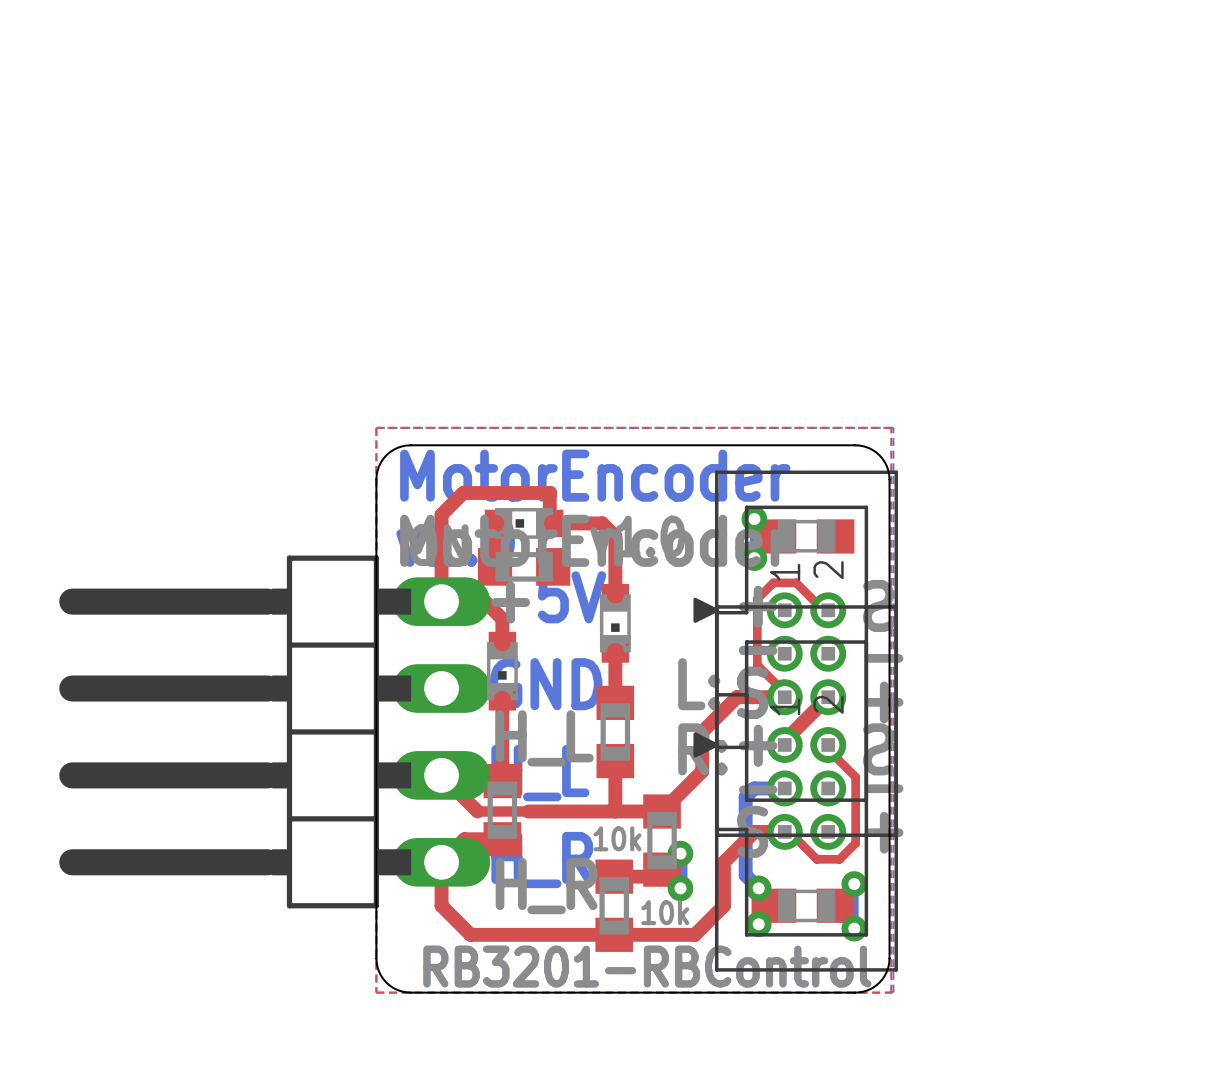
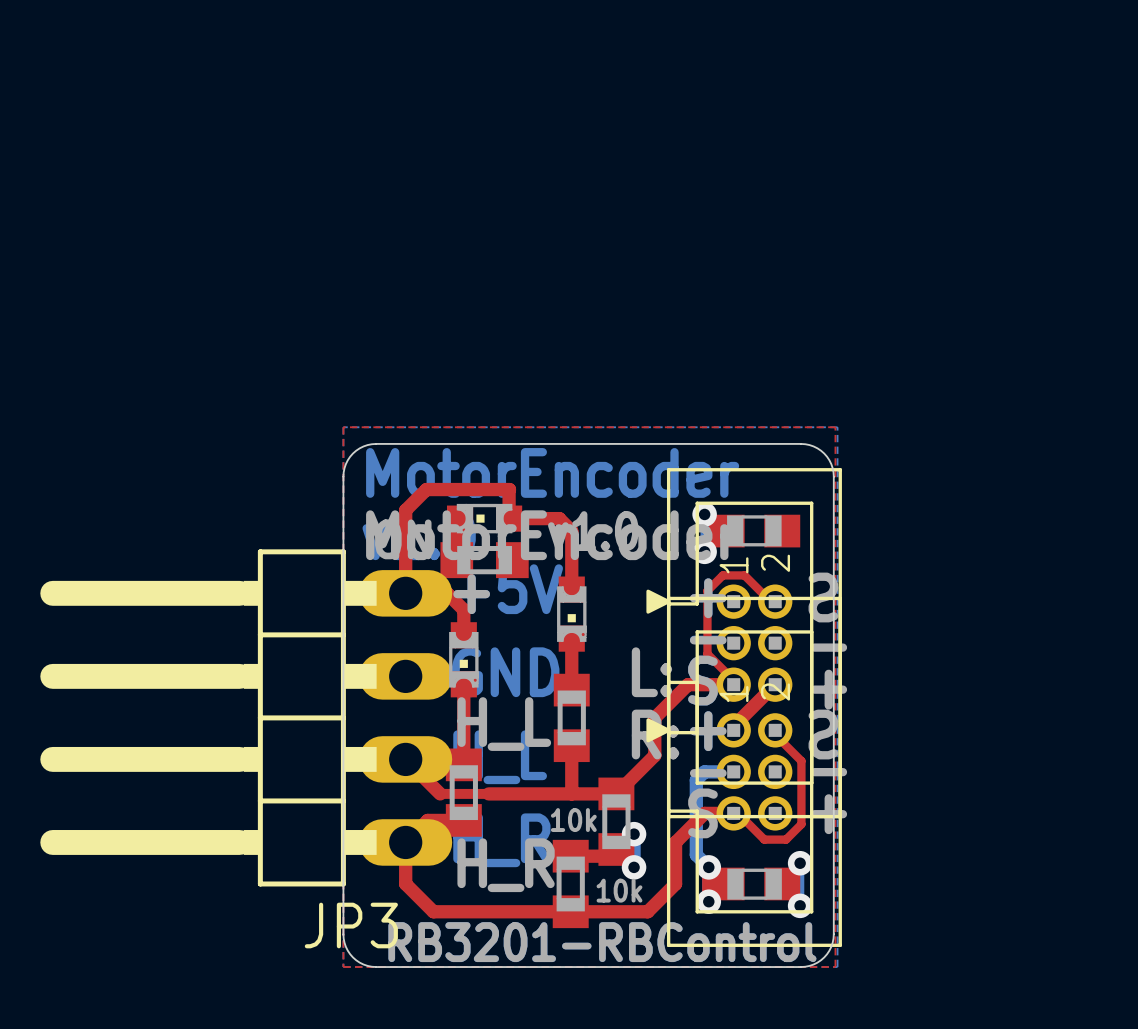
JP3 name: none -> JP3 (351, 925)

